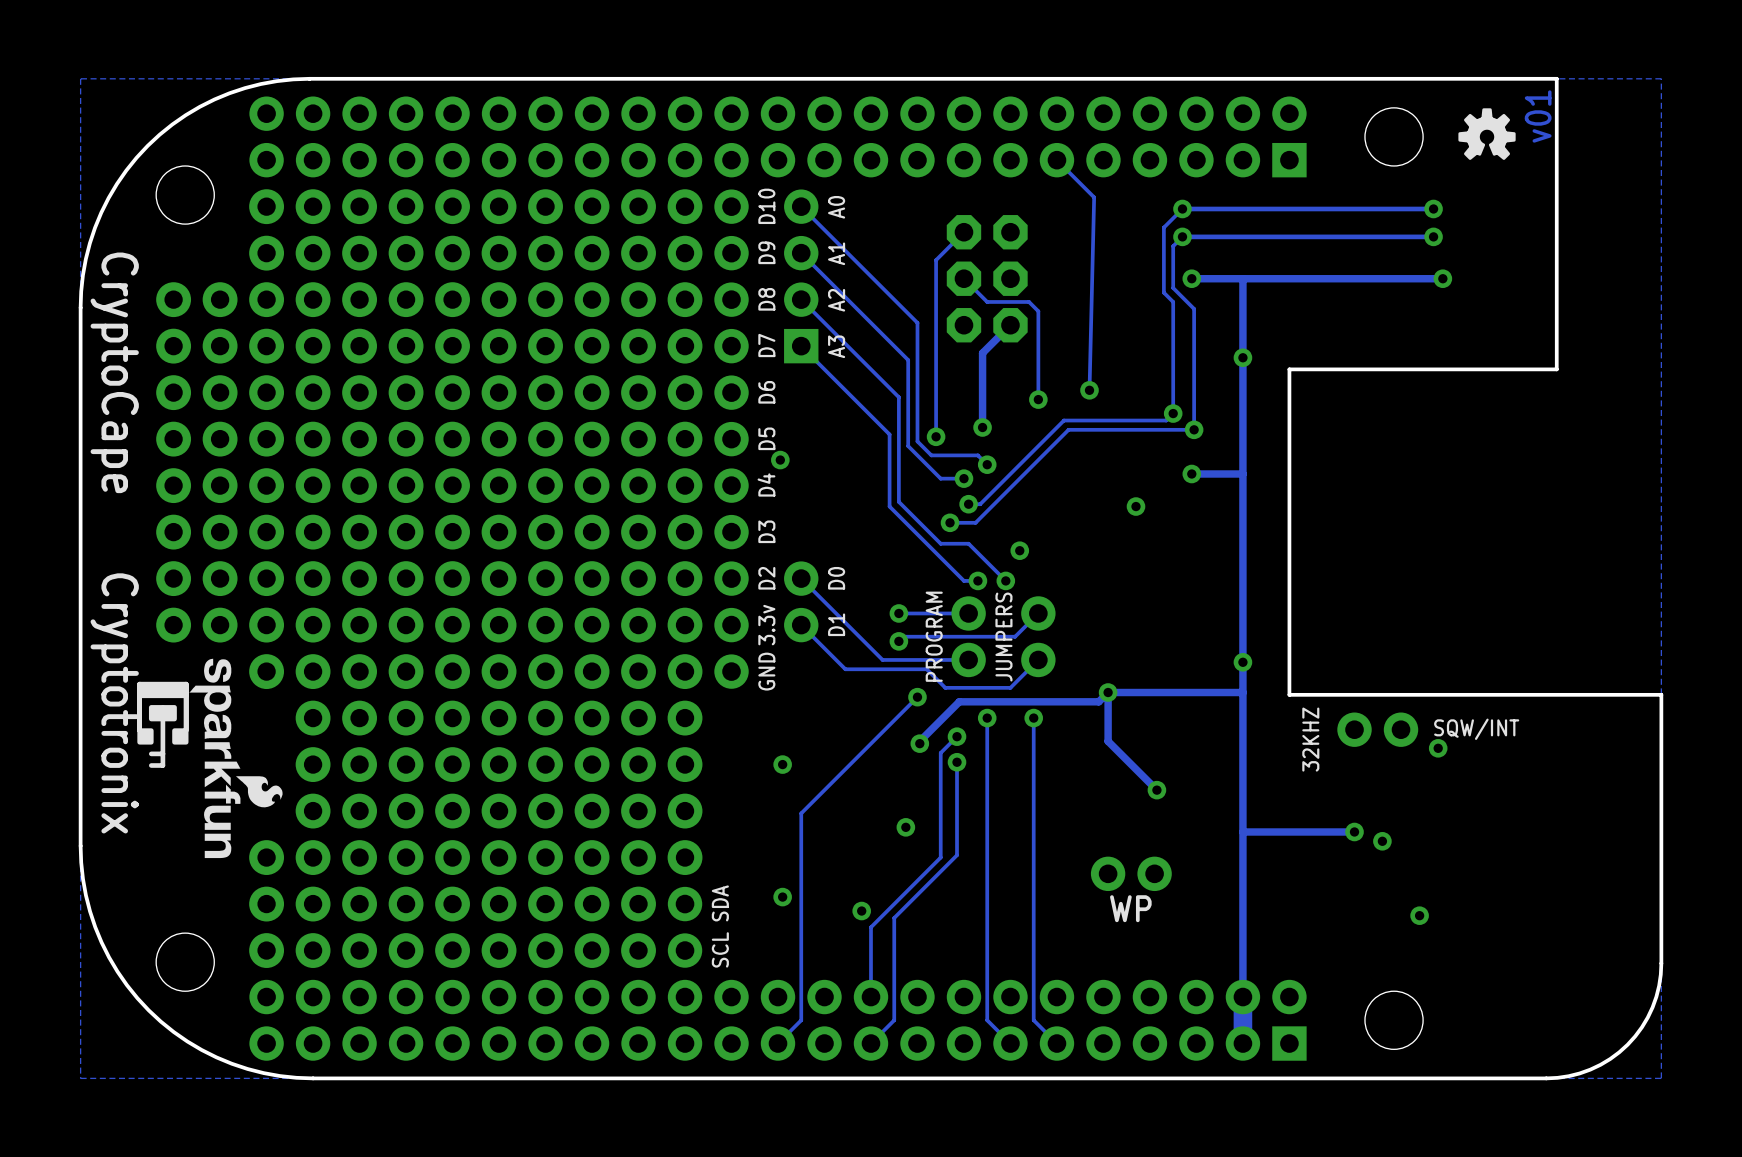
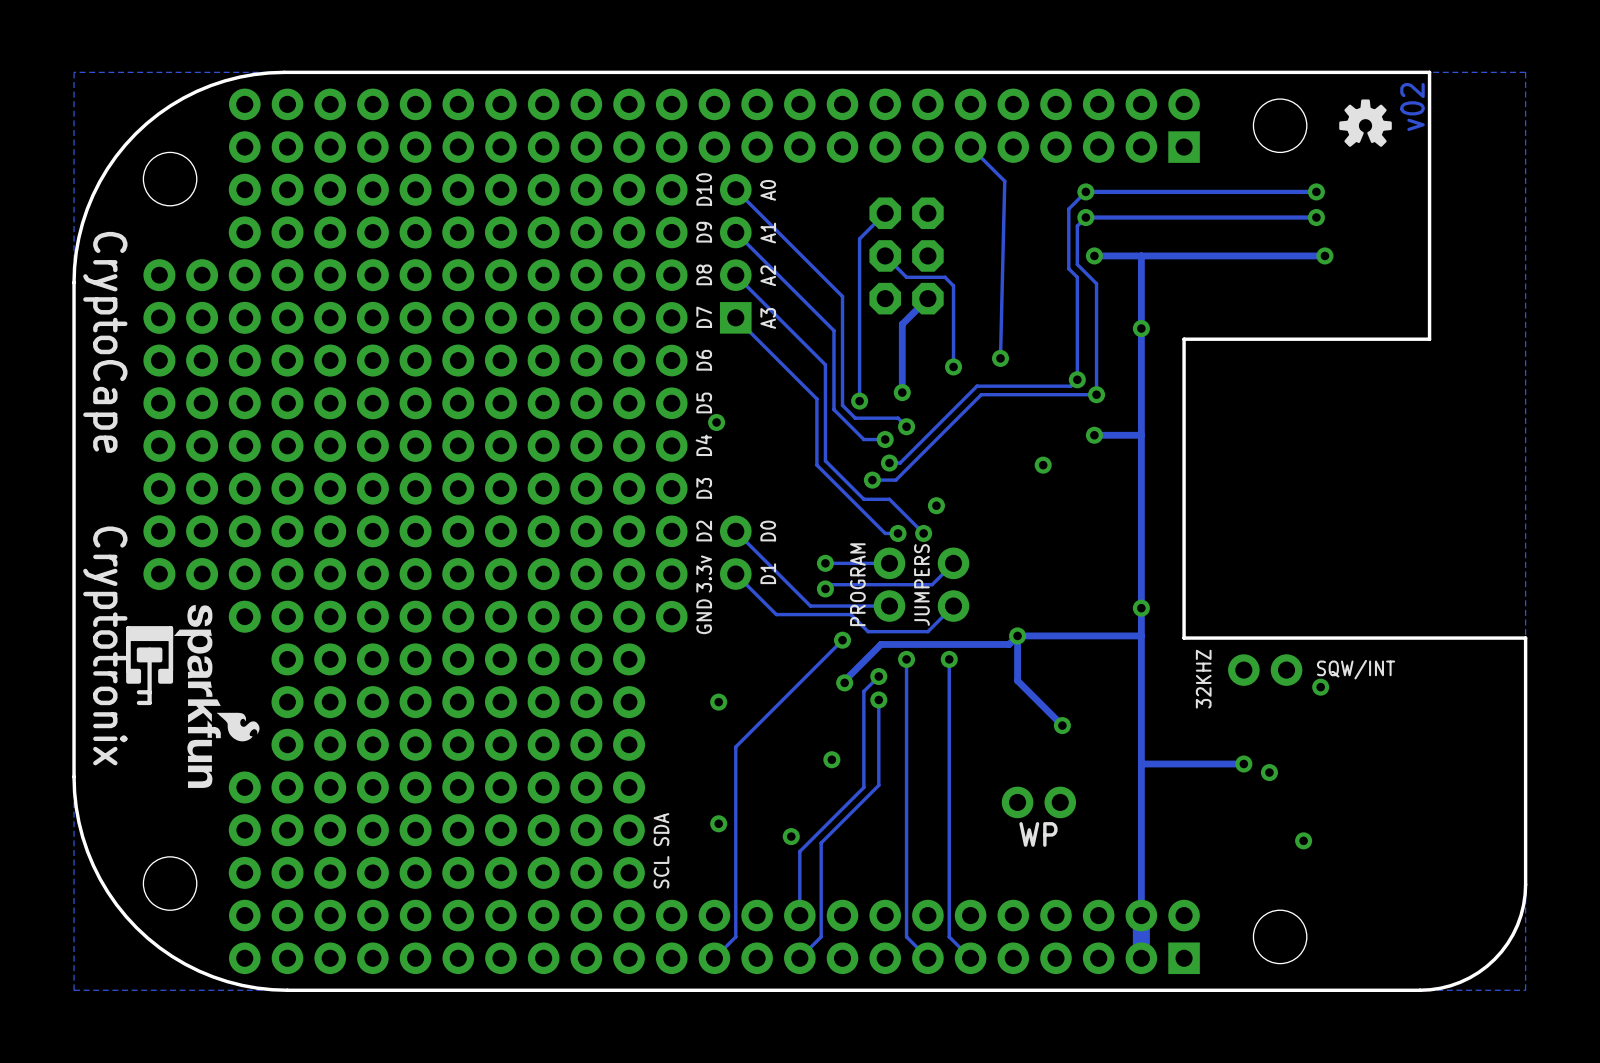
text: v01 (1538, 116) -> v02 (1412, 106)

